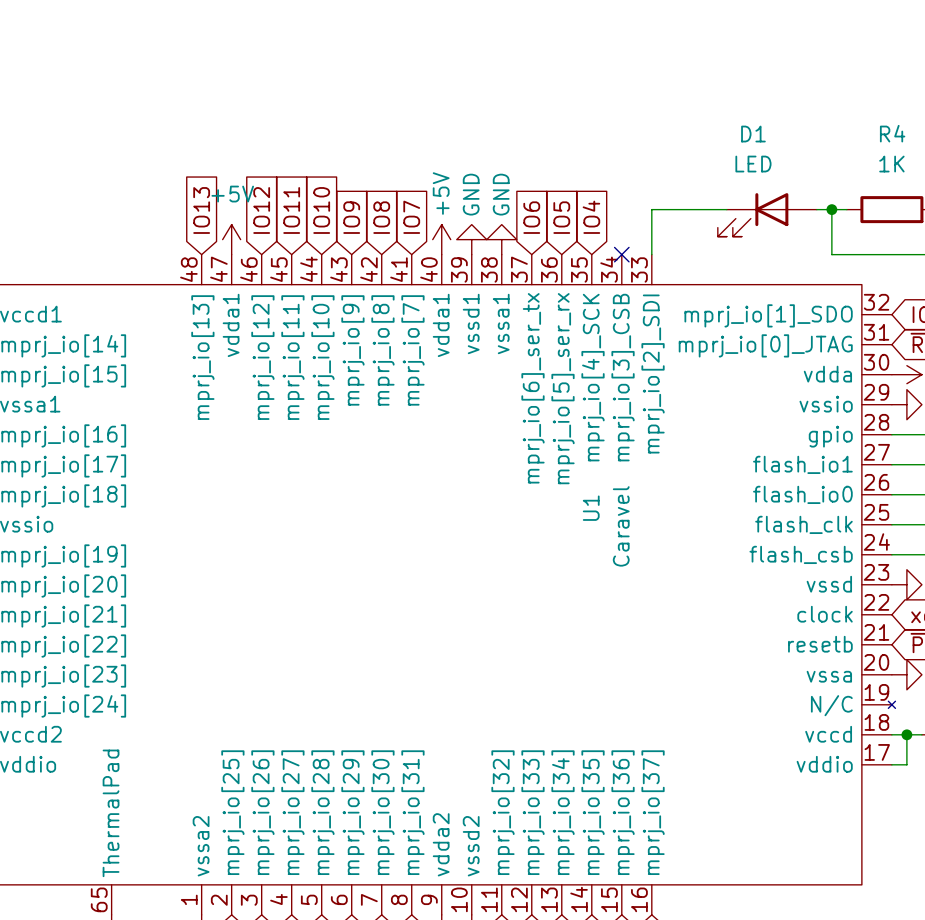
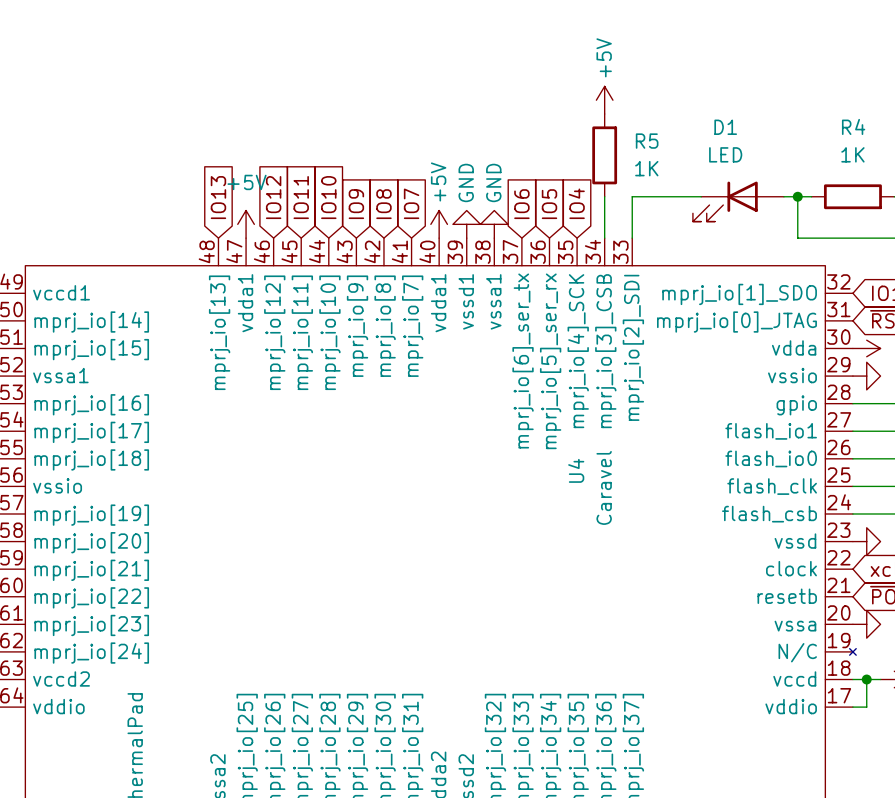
power symbol: none -> +5V (604, 100)
R5: none -> 1K (604, 155)
wire: none -> (604, 196) (604, 238)
no-connect mark: (621, 254) -> none
U1 name: U1 (591, 508) -> U4 (576, 470)

